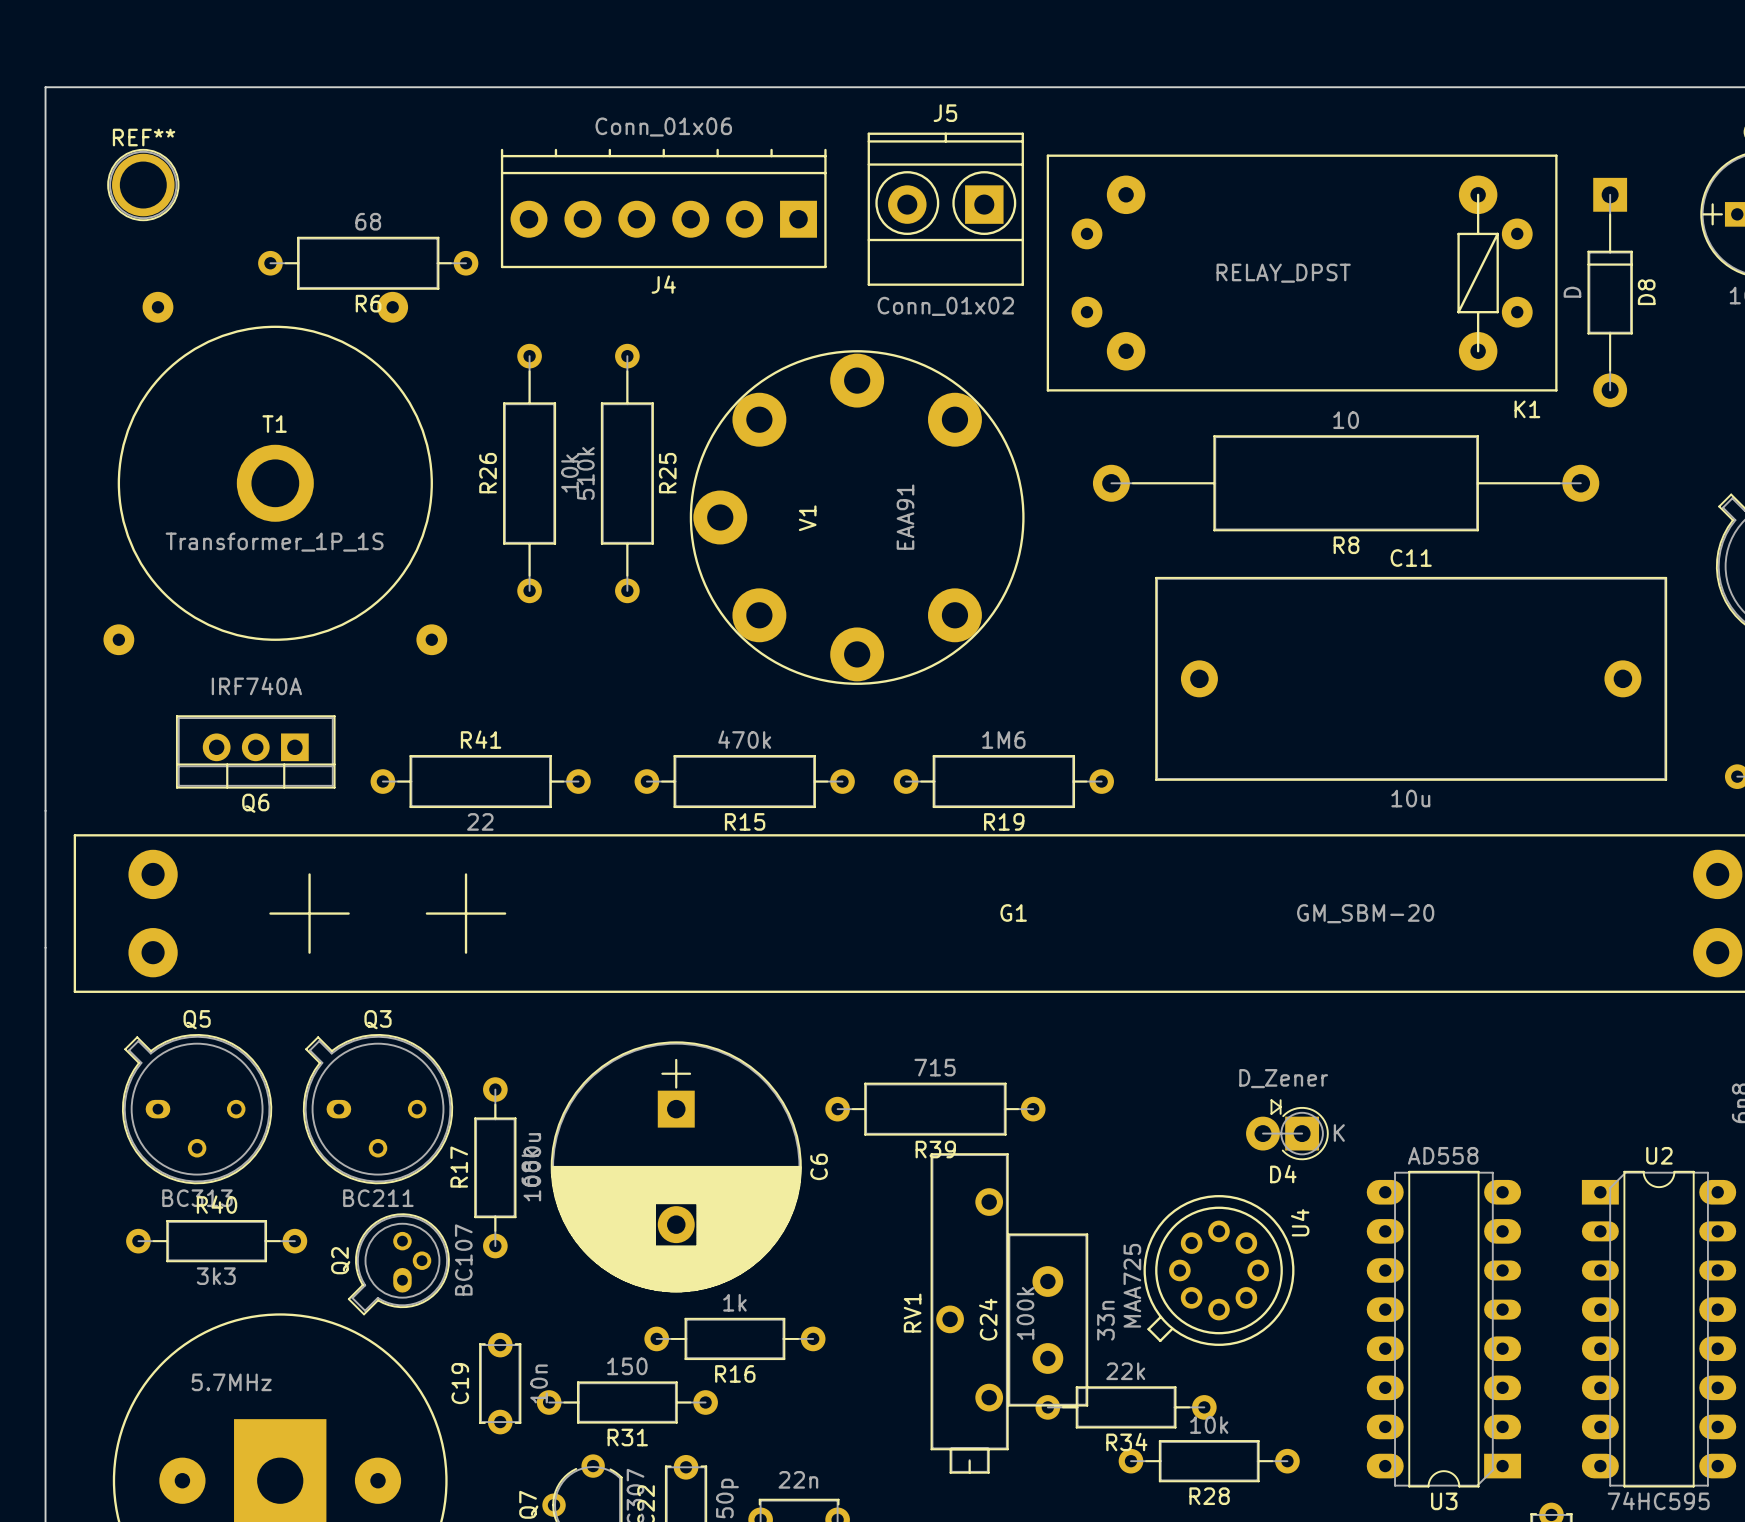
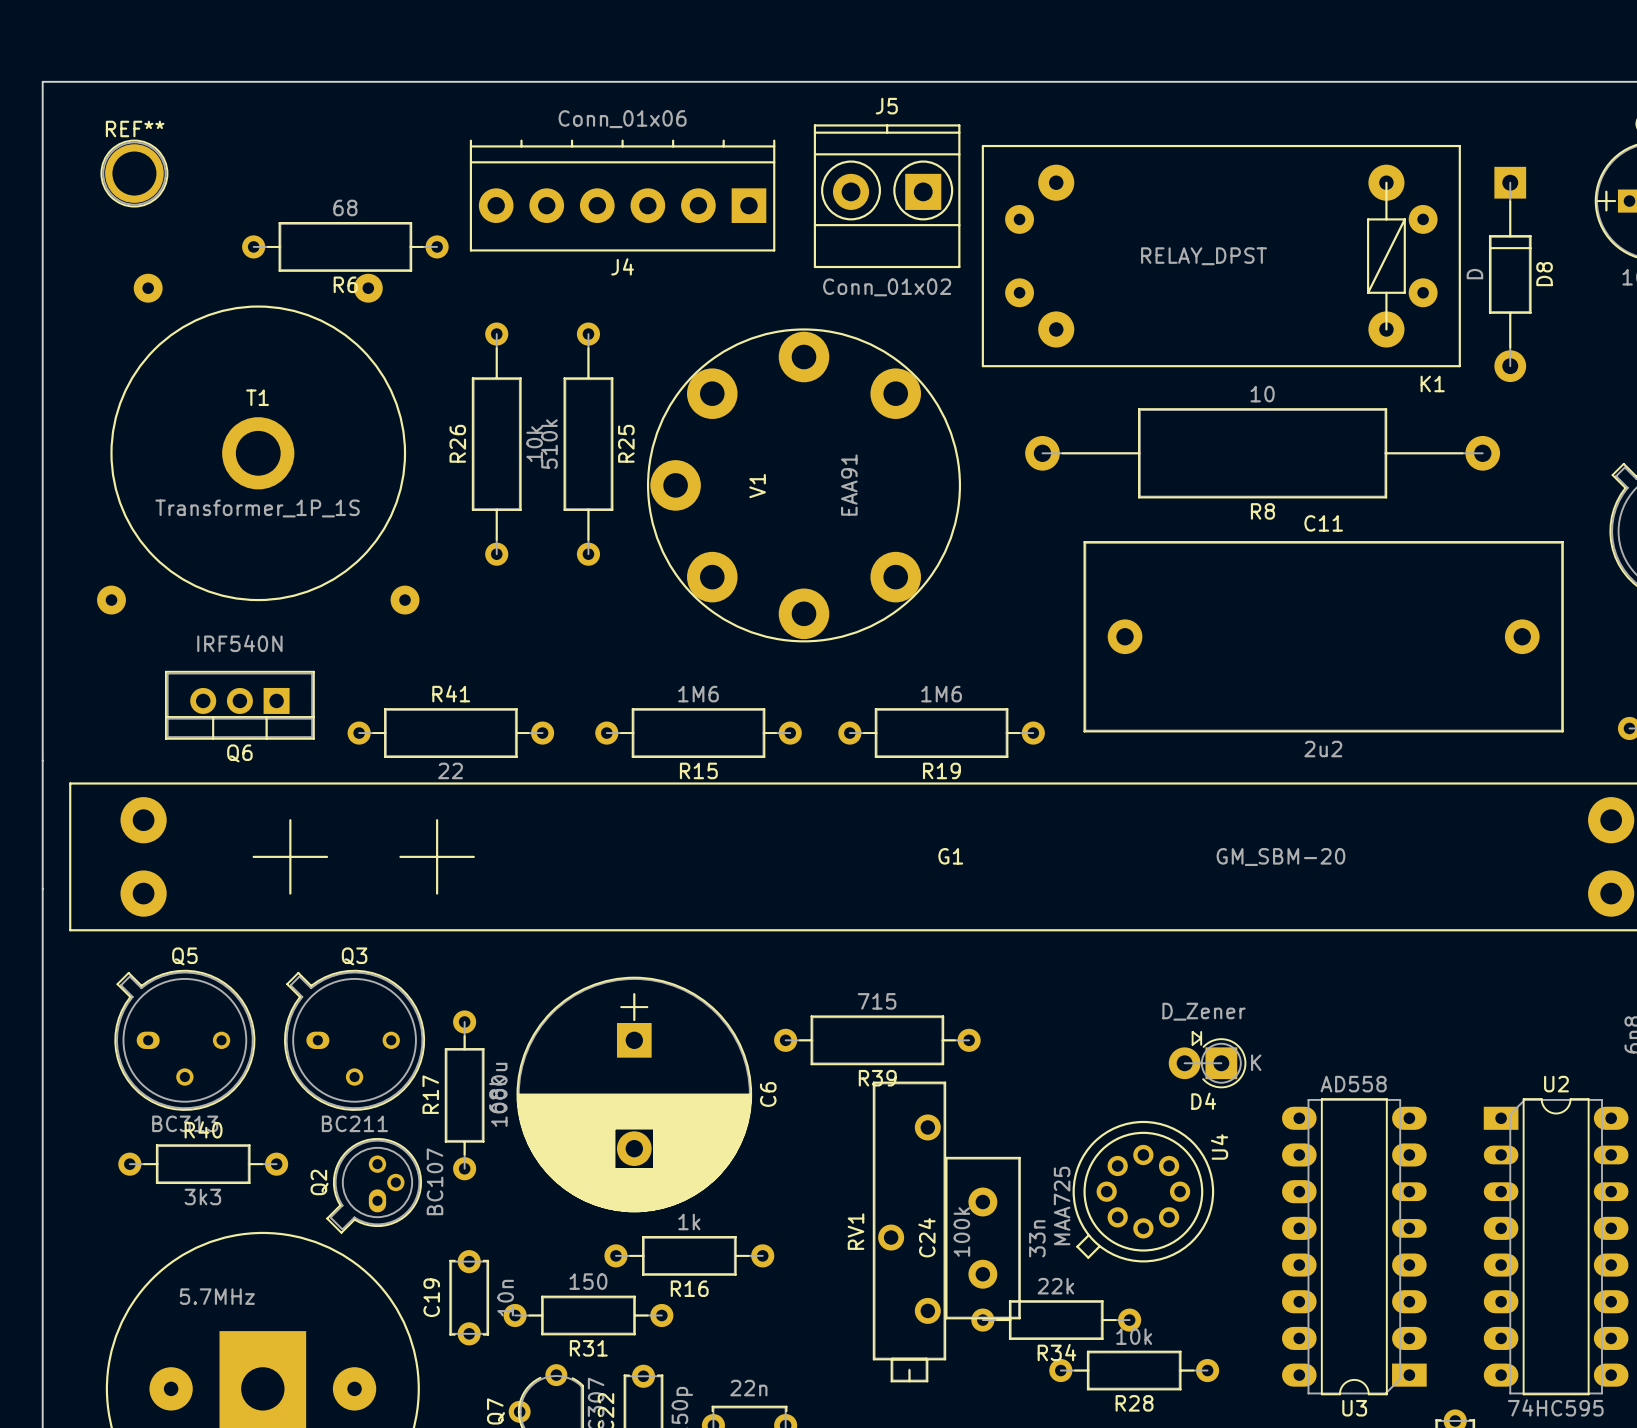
Q6 value: IRF740A (256, 686) -> IRF540N (239, 643)
R15 value: 470k (744, 739) -> 1M6 (698, 694)
C11 value: 10u (1410, 798) -> 2u2 (1323, 749)

